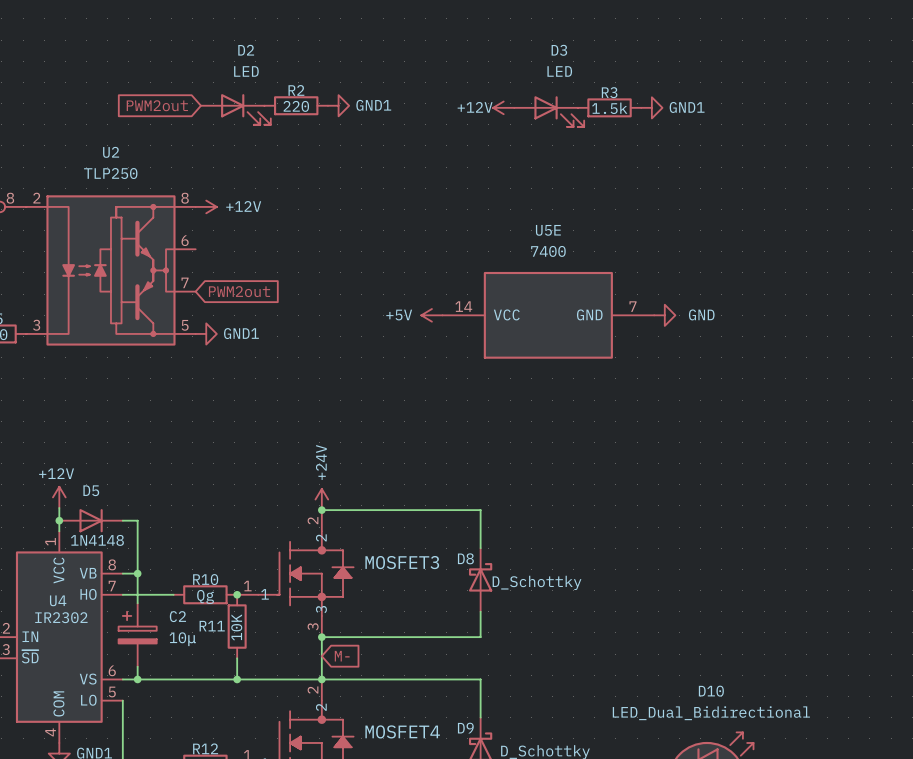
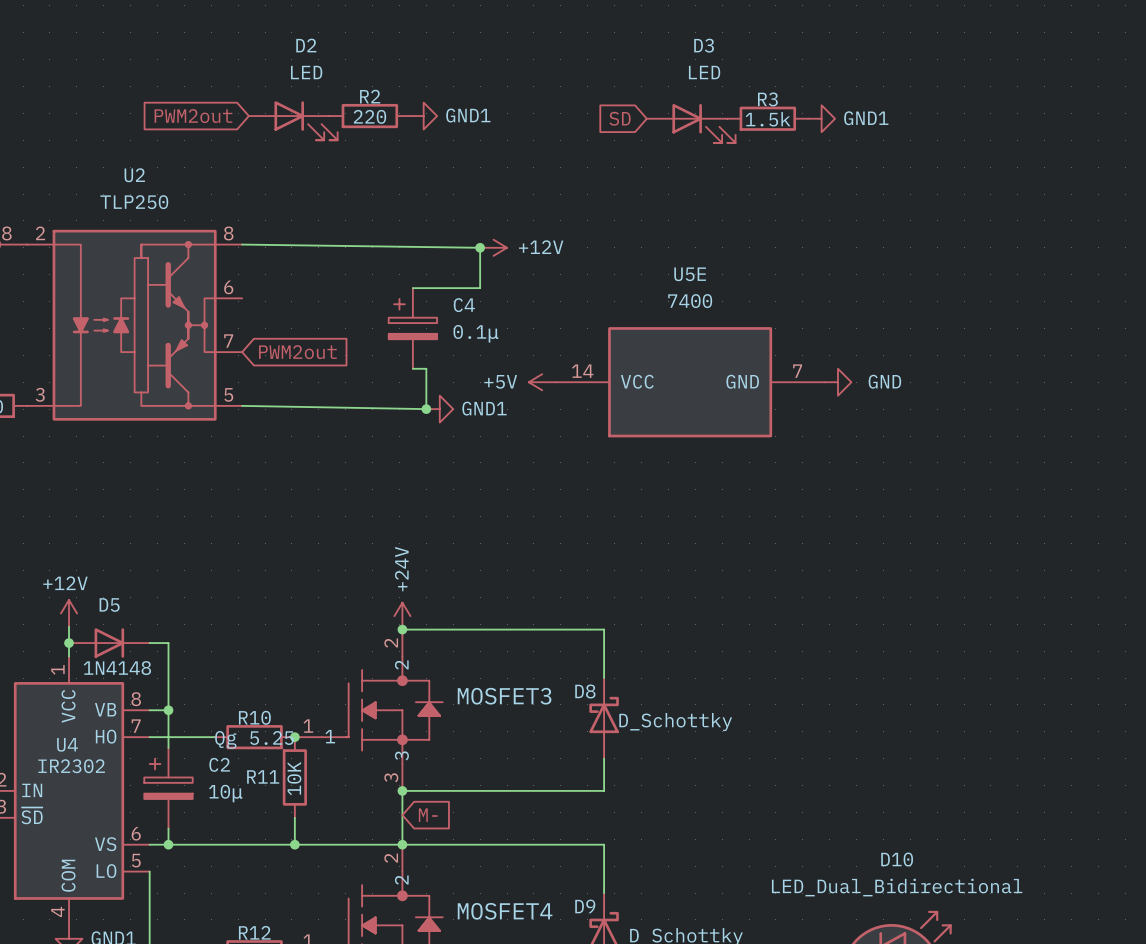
global label: none -> SD (620, 118)
power symbol: +12V (503, 107) -> none
wire: none -> (242, 244) (480, 247) (480, 288) (412, 288)
power symbol: +12V (206, 206) -> none
junction: none -> (480, 247)
power symbol: none -> +12V (493, 247)
C4: none -> 0.1μ (412, 328)
wire: none -> (412, 368) (426, 368) (426, 409) (242, 405)
power symbol position: GND1 (206, 333) -> GND1 (439, 409)
junction: none -> (426, 409)
R10 value: Qg (205, 596) -> Qg 5.25 (254, 739)

